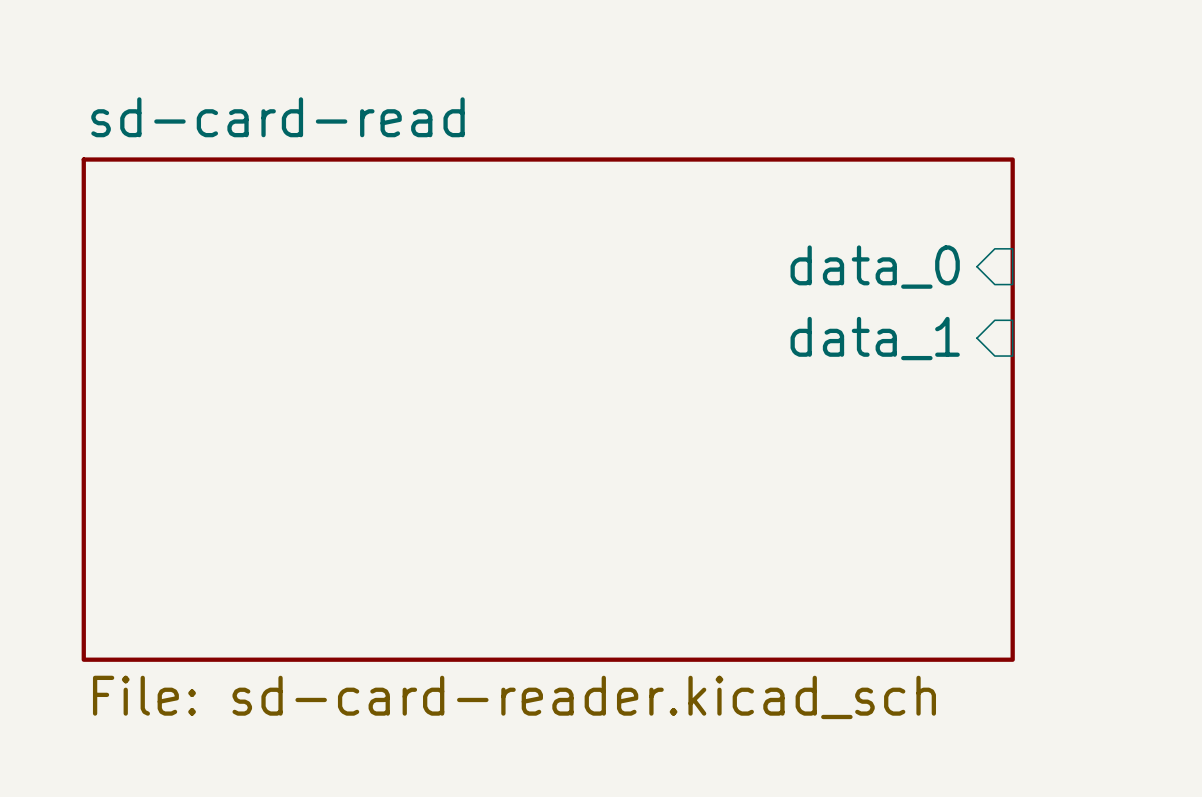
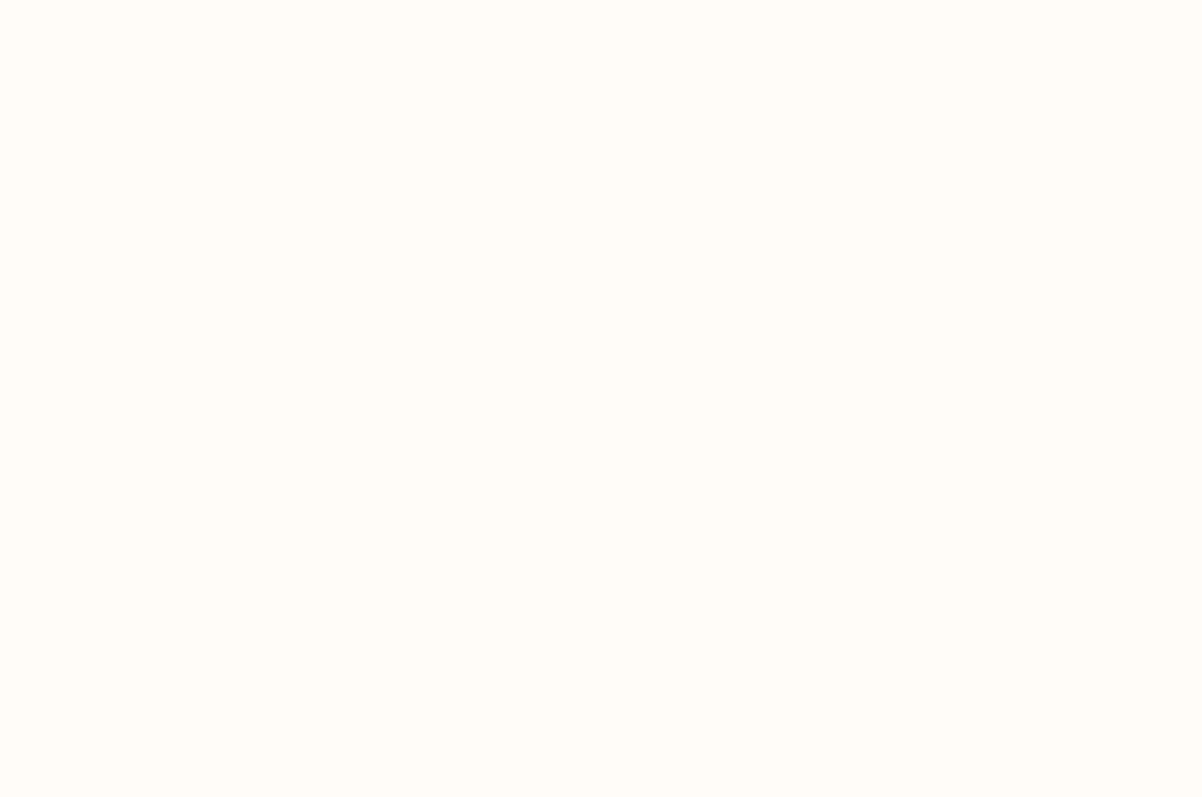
sheet pin: data_0 (875, 267) -> none
sheet pin: data_1 (875, 338) -> none
sheet sd-card-read: File: sd-card-reader.kicad_sch (548, 409) -> none

